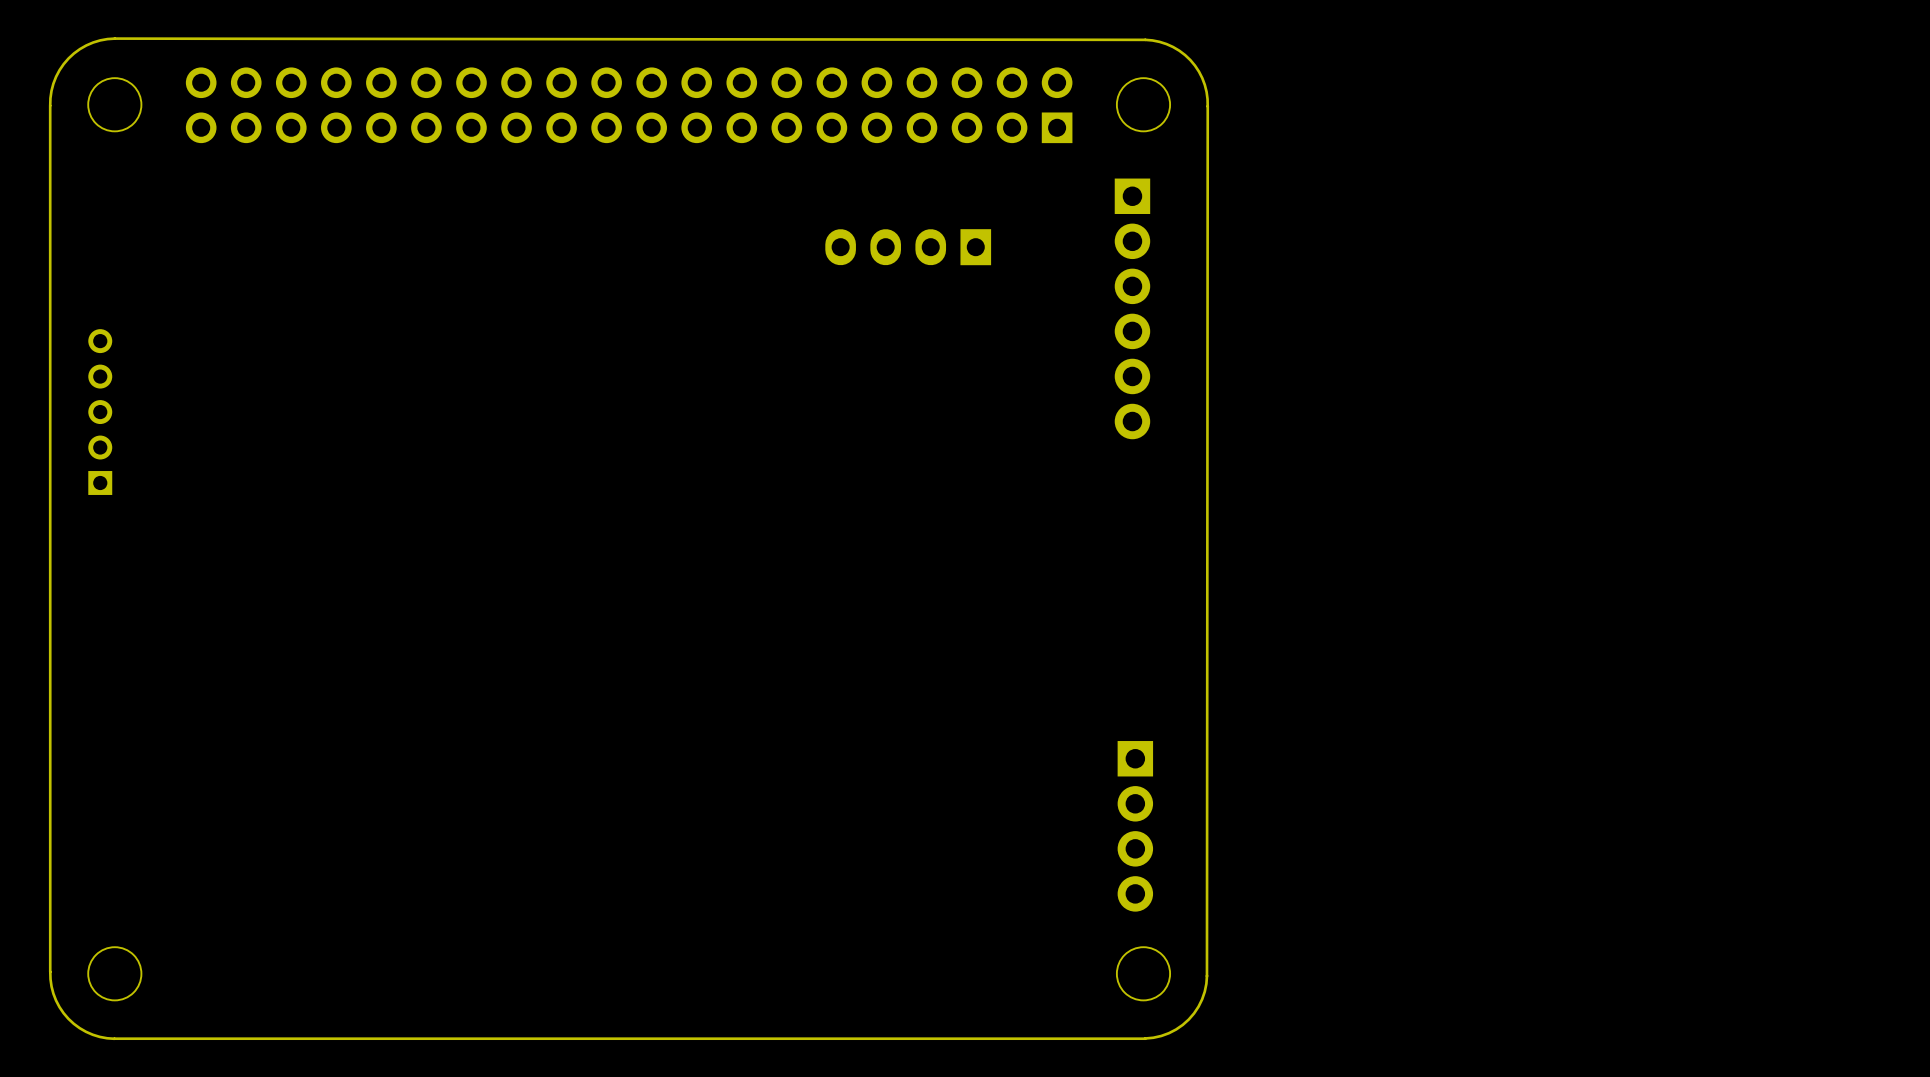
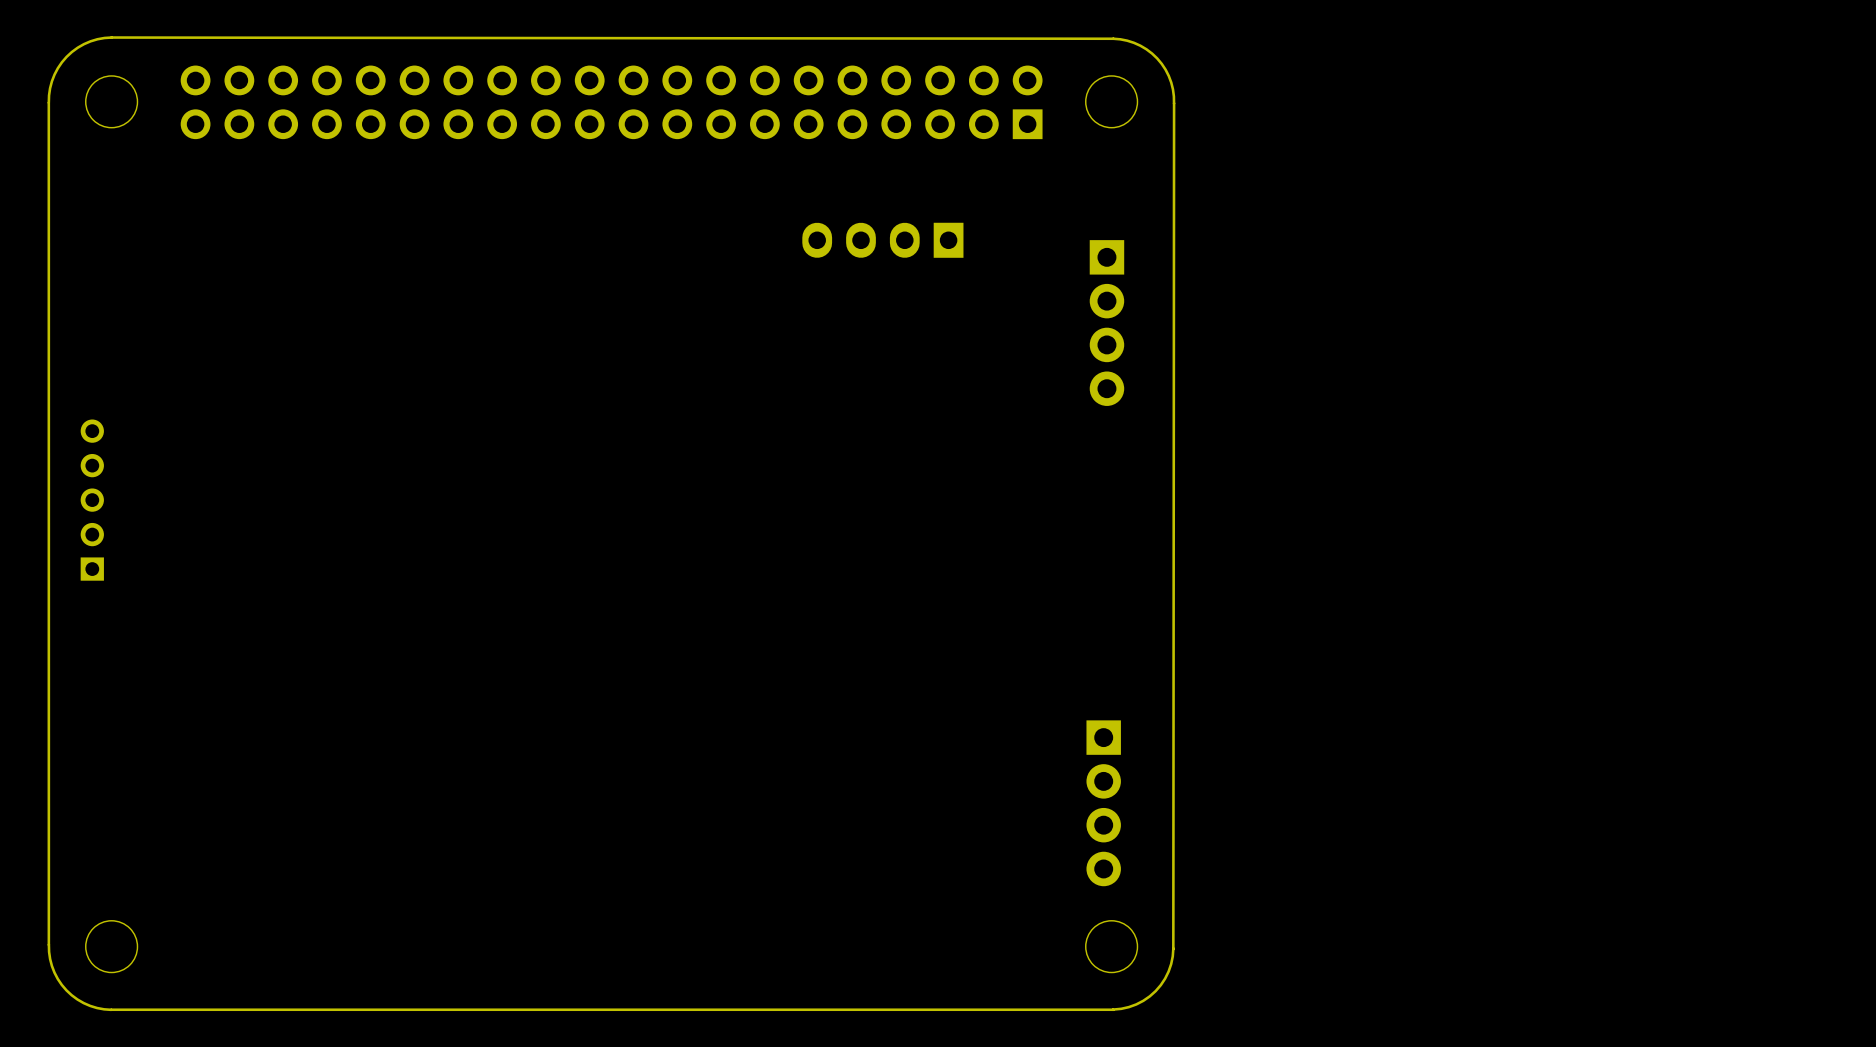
part: (1132, 308) -> none
part: none -> (1106, 323)
part position: (100, 412) -> (92, 500)

